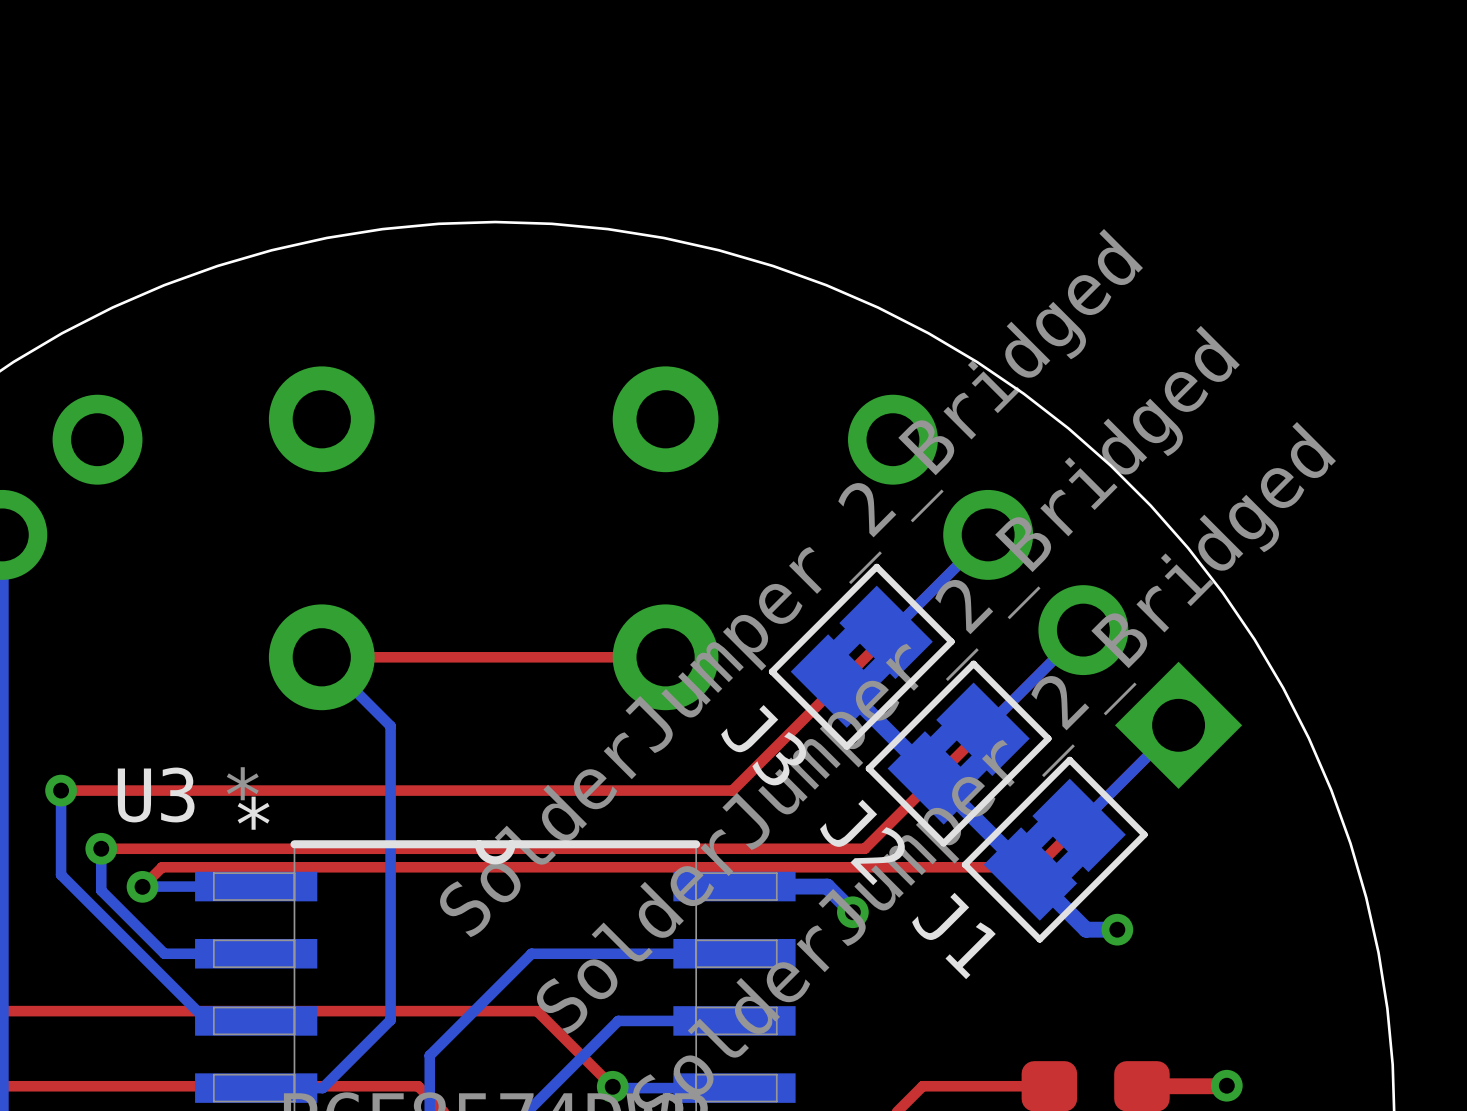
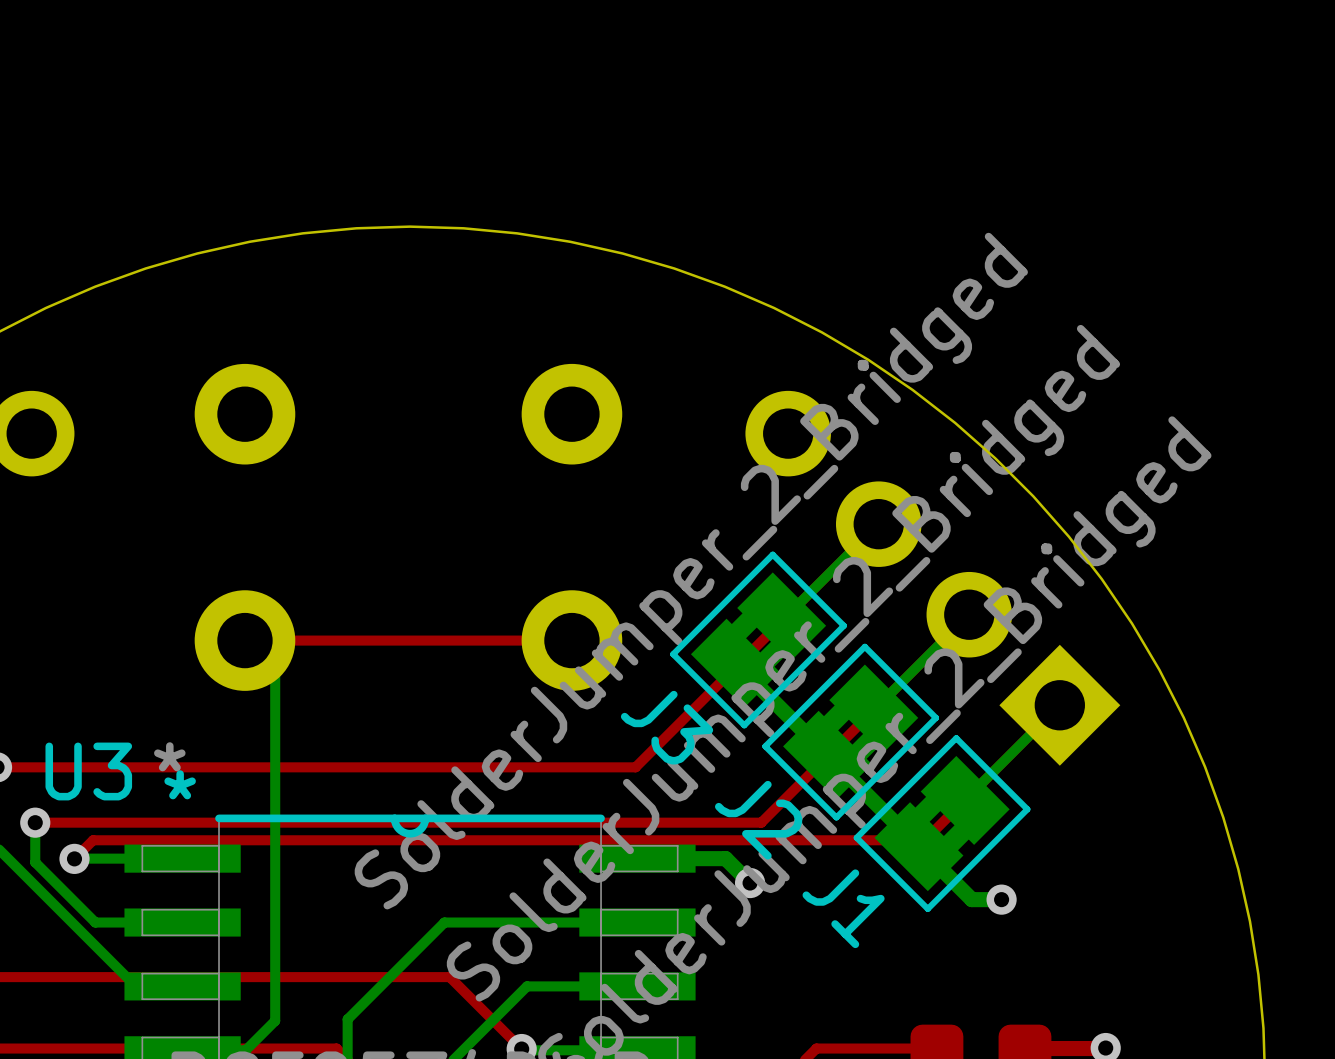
bottom track: (353, 689) (390, 726) (390, 1020) (353, 1057) -> (275, 670) (275, 1020)

